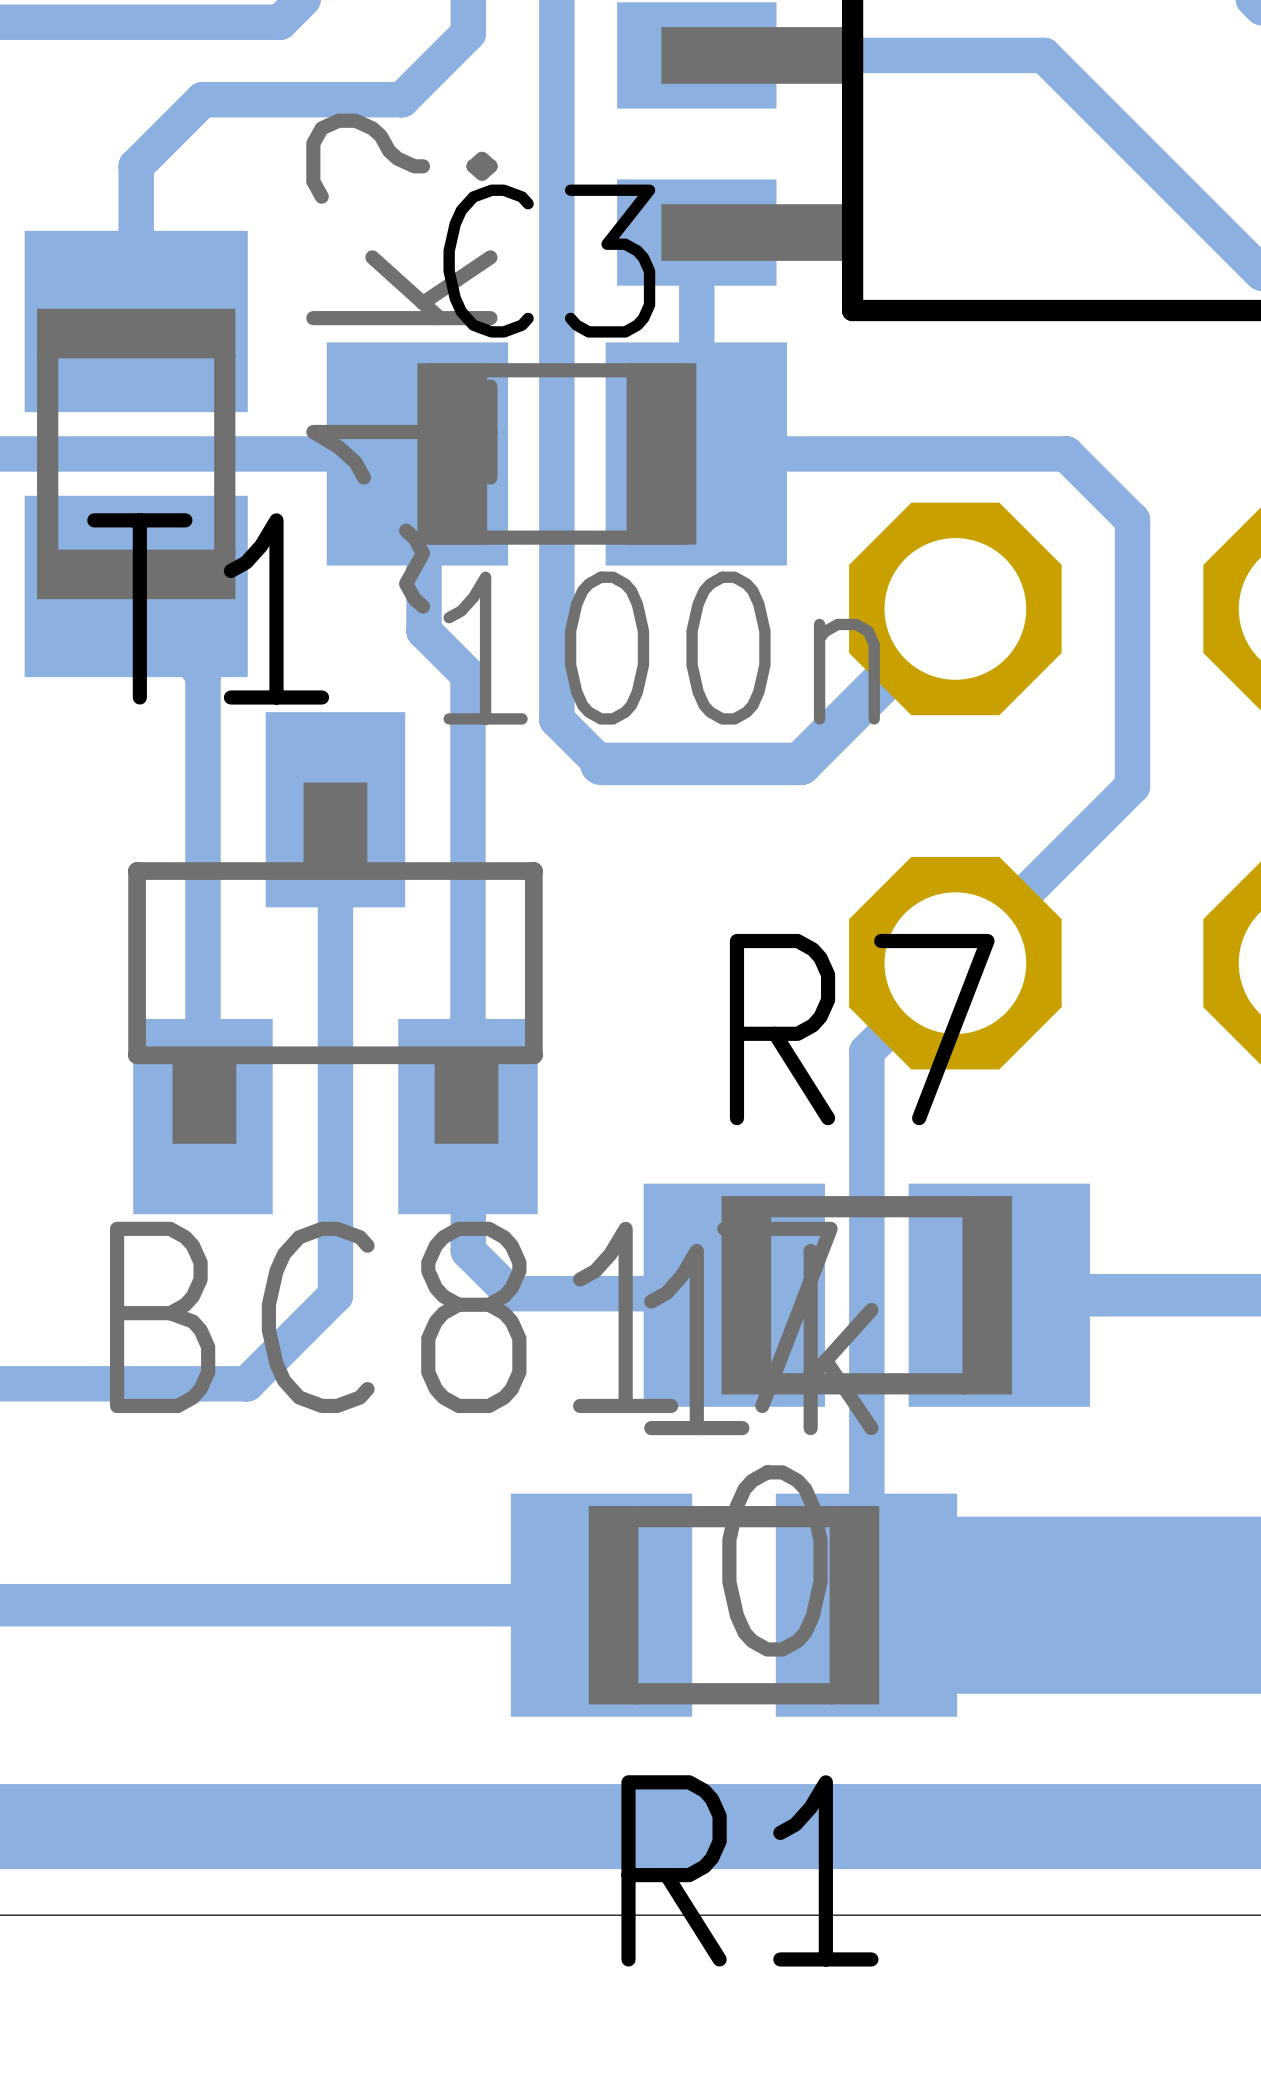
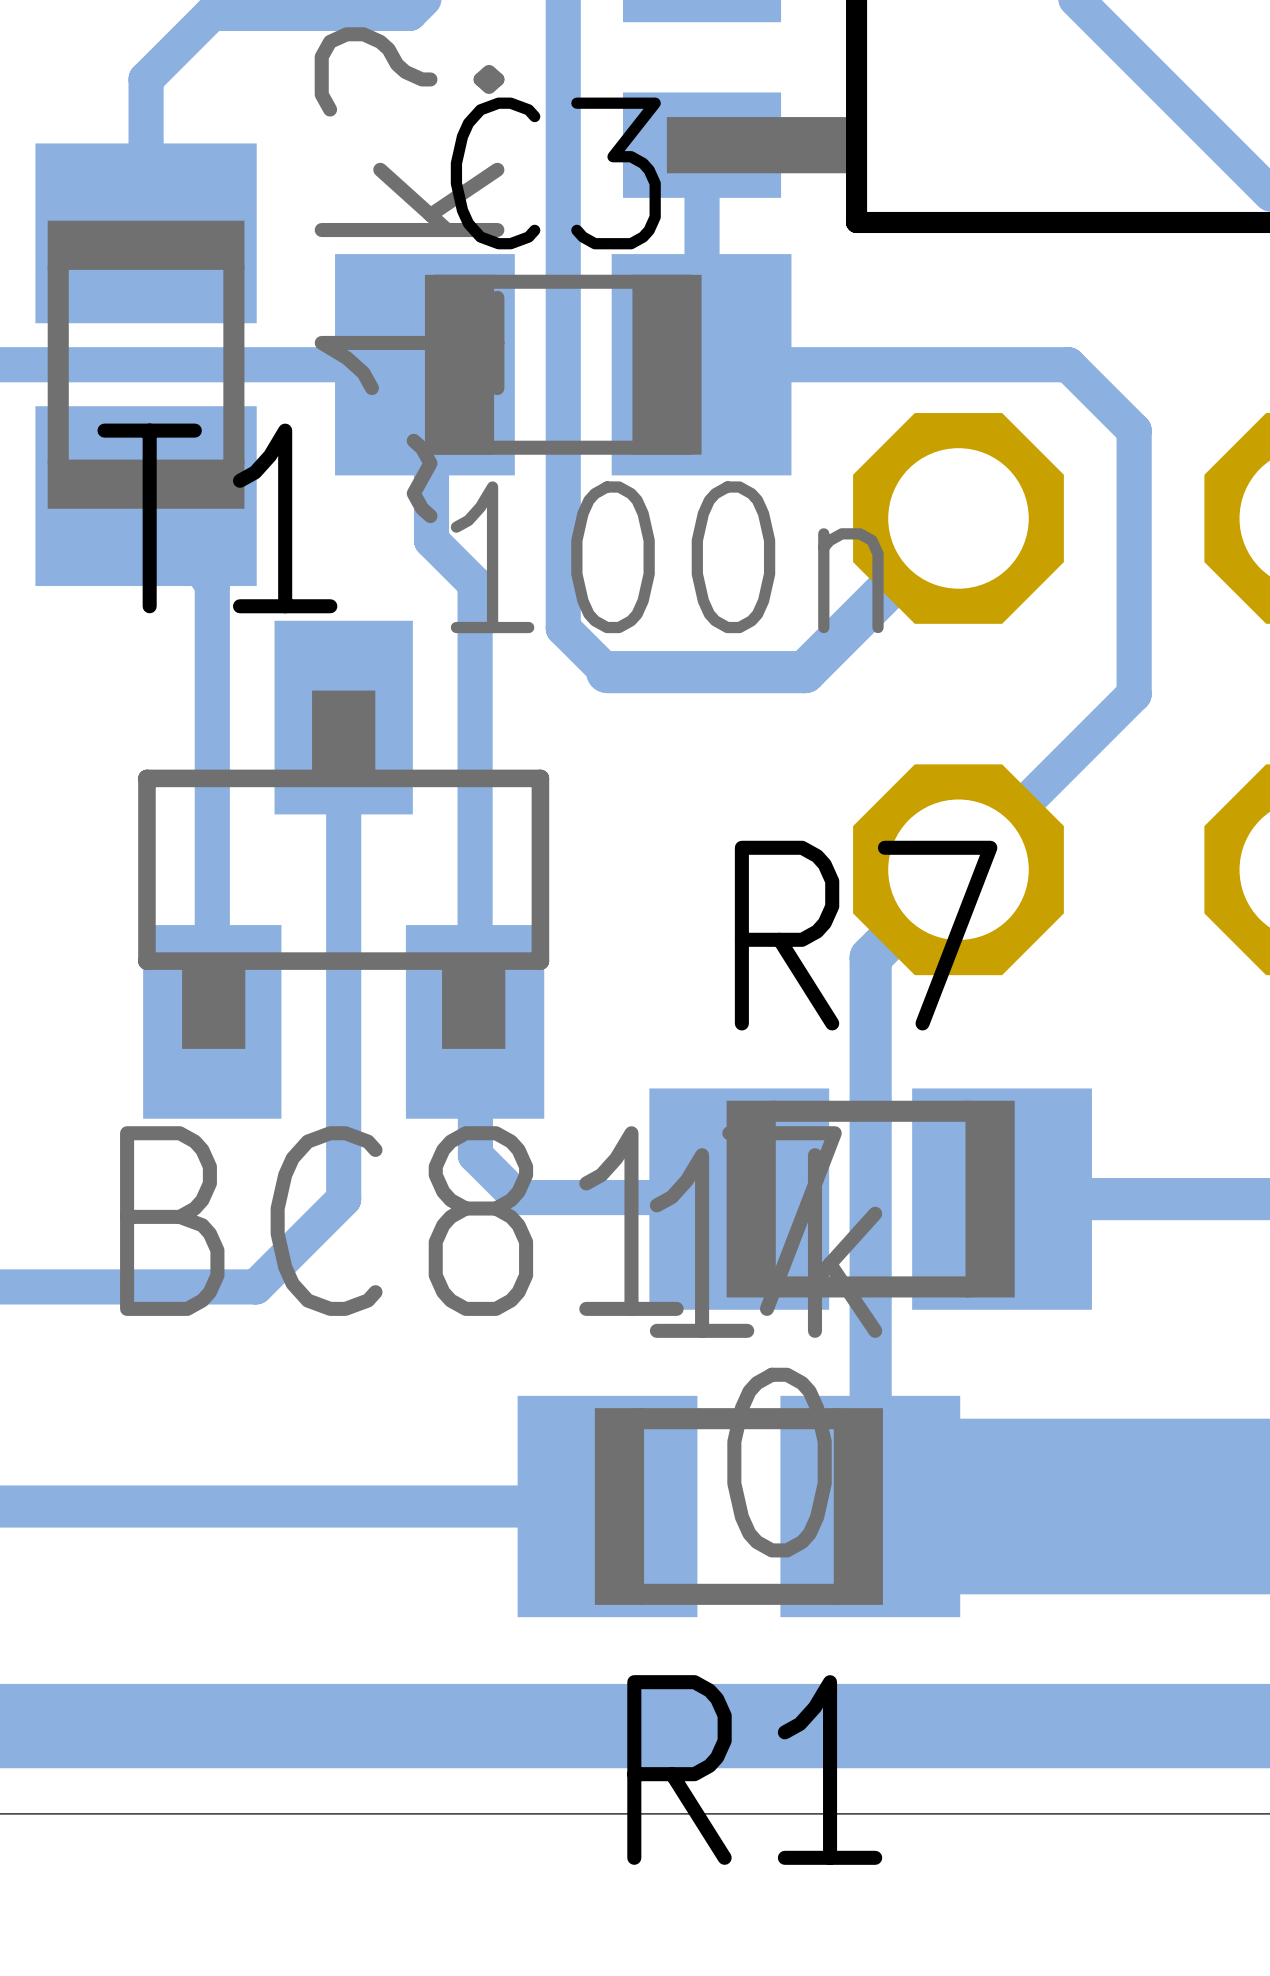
track width: thin (955, 963) (866, 1051) (866, 1560) -> thick (958, 869) (870, 957) (870, 1462)

